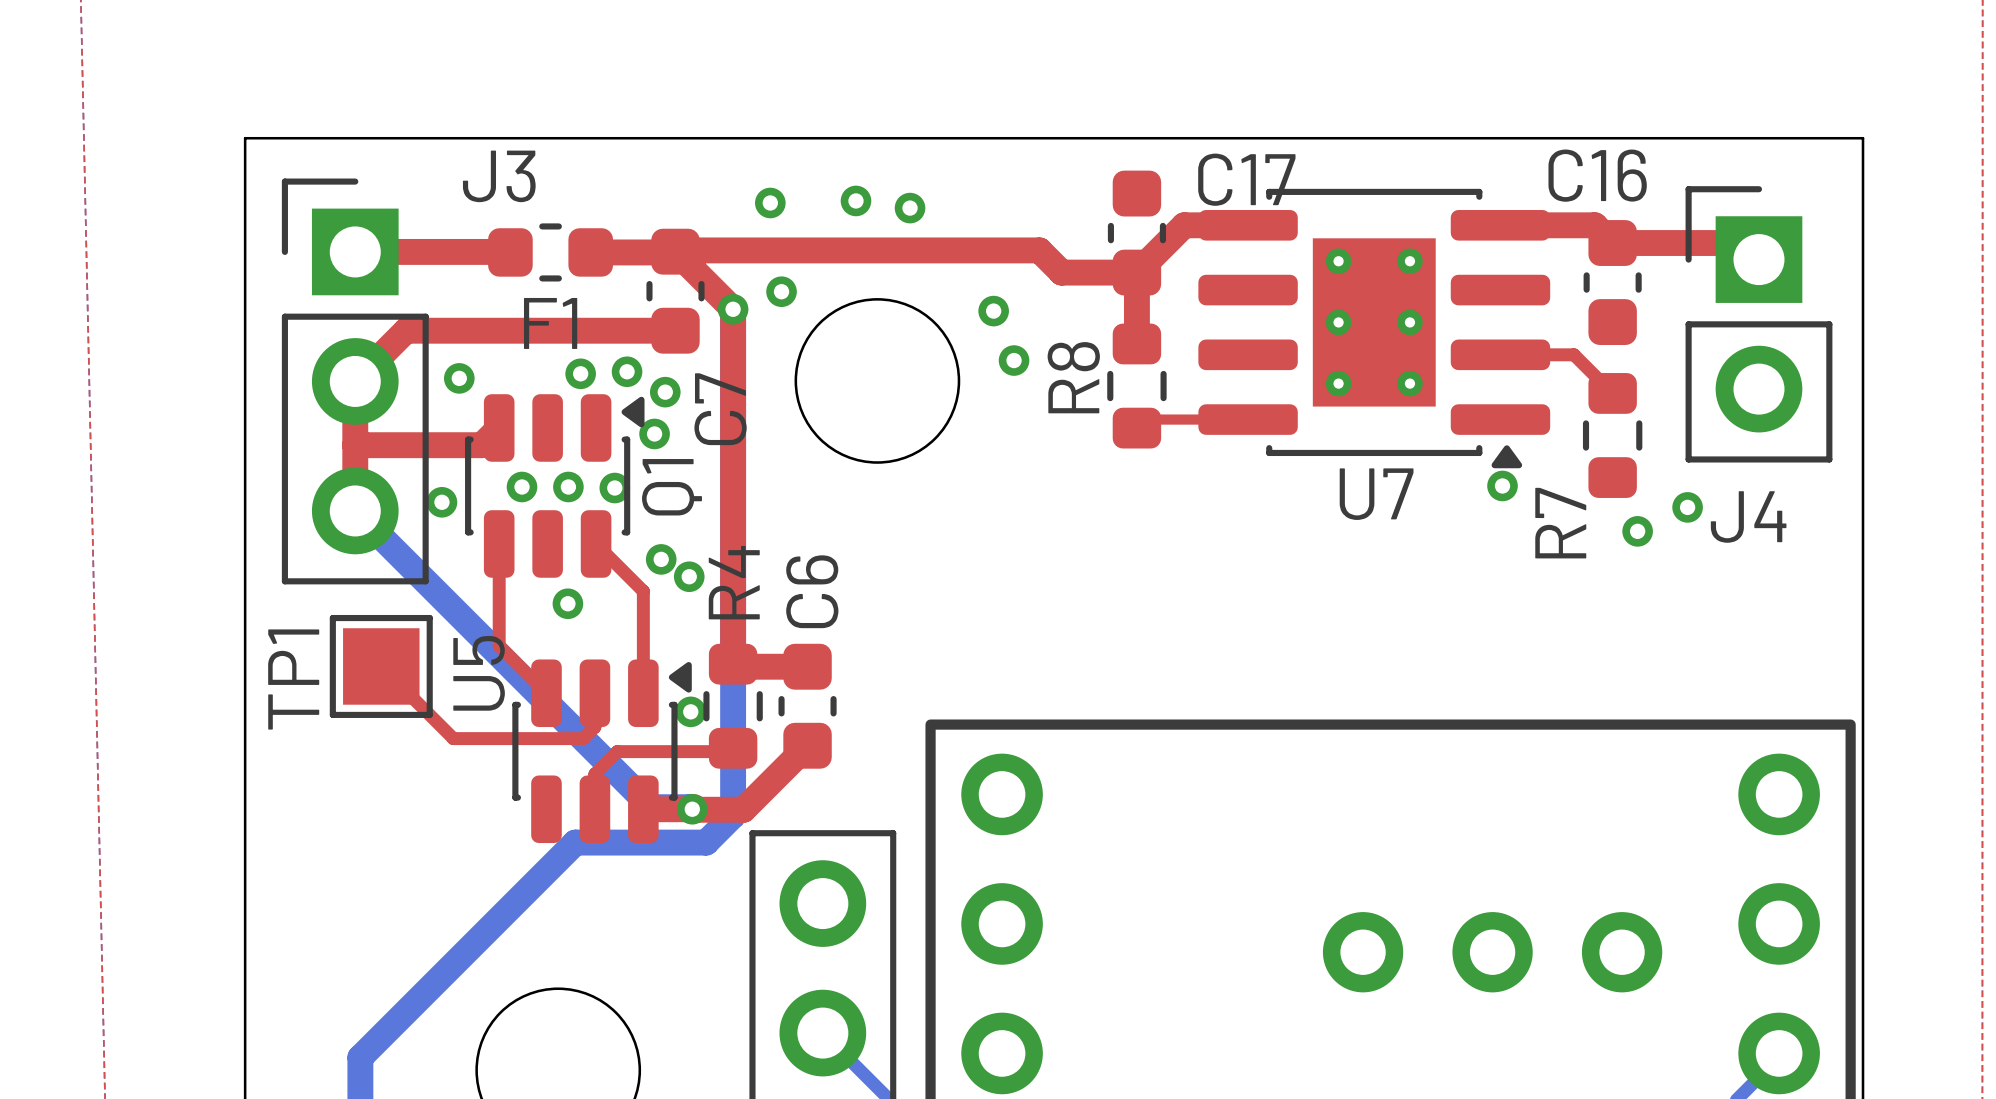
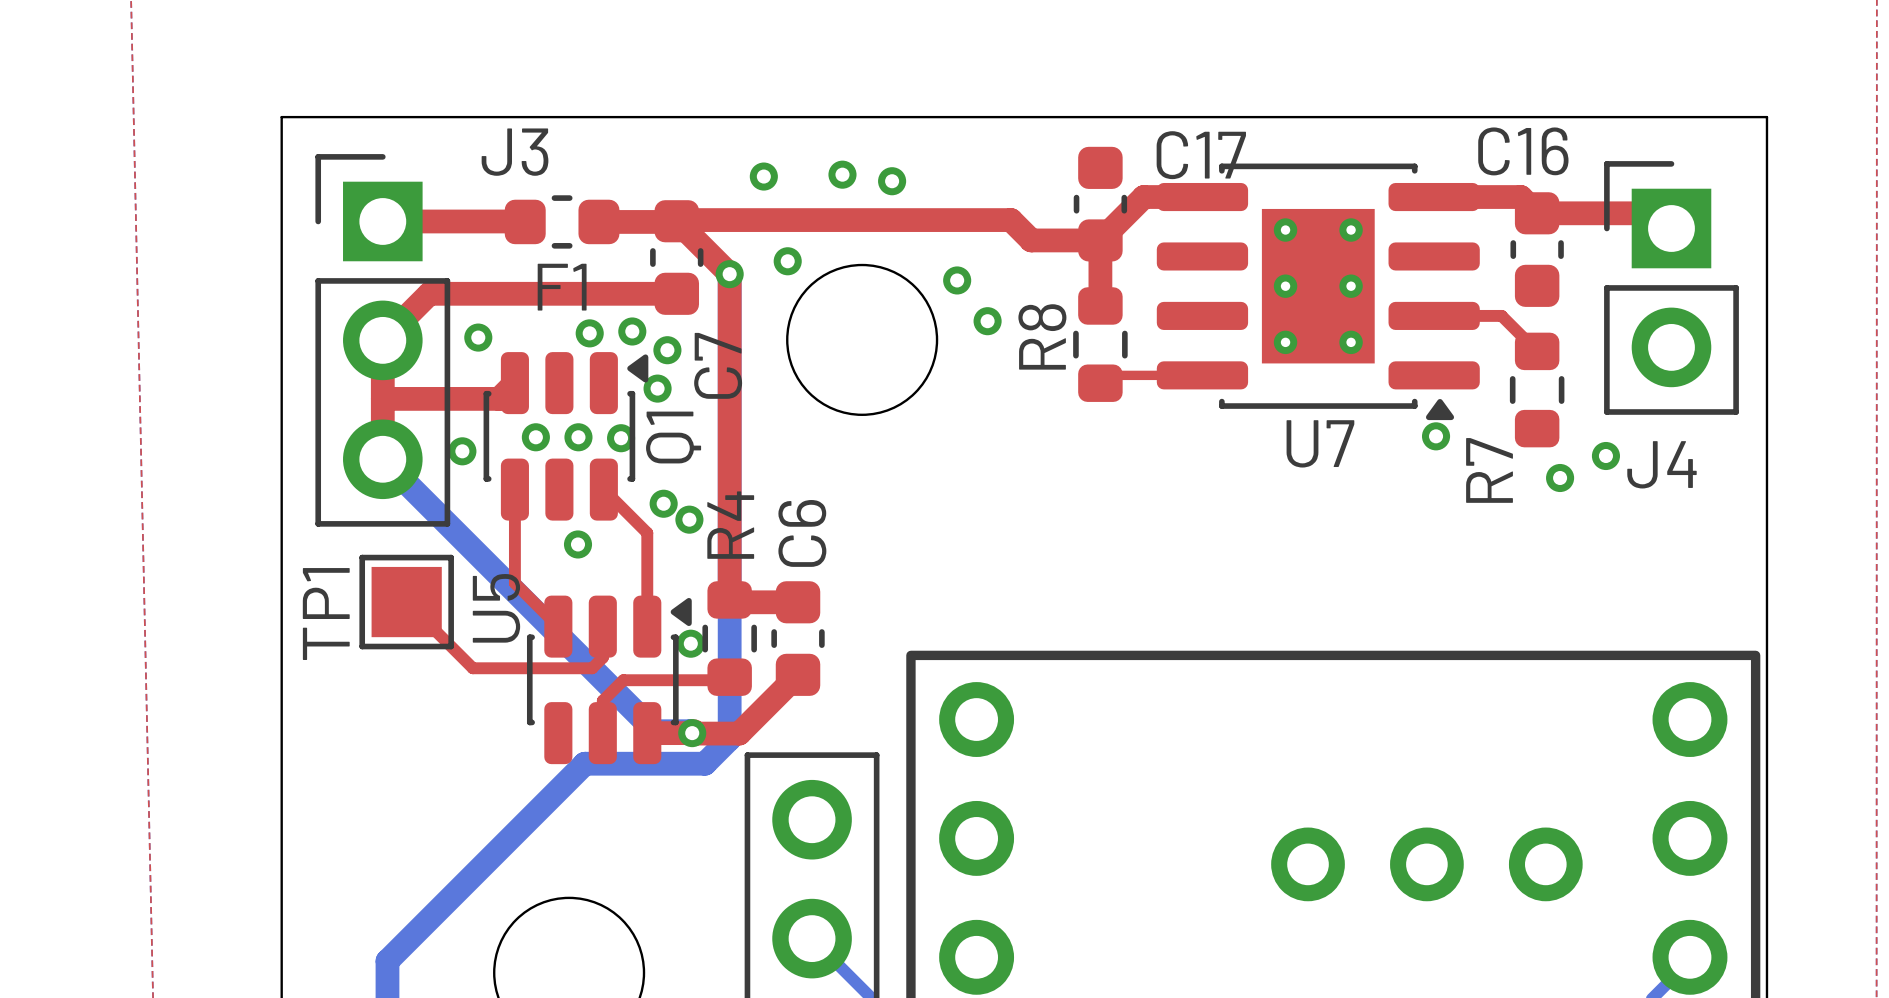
via position: (781, 291) -> (787, 261)
via position: (993, 311) -> (957, 280)

